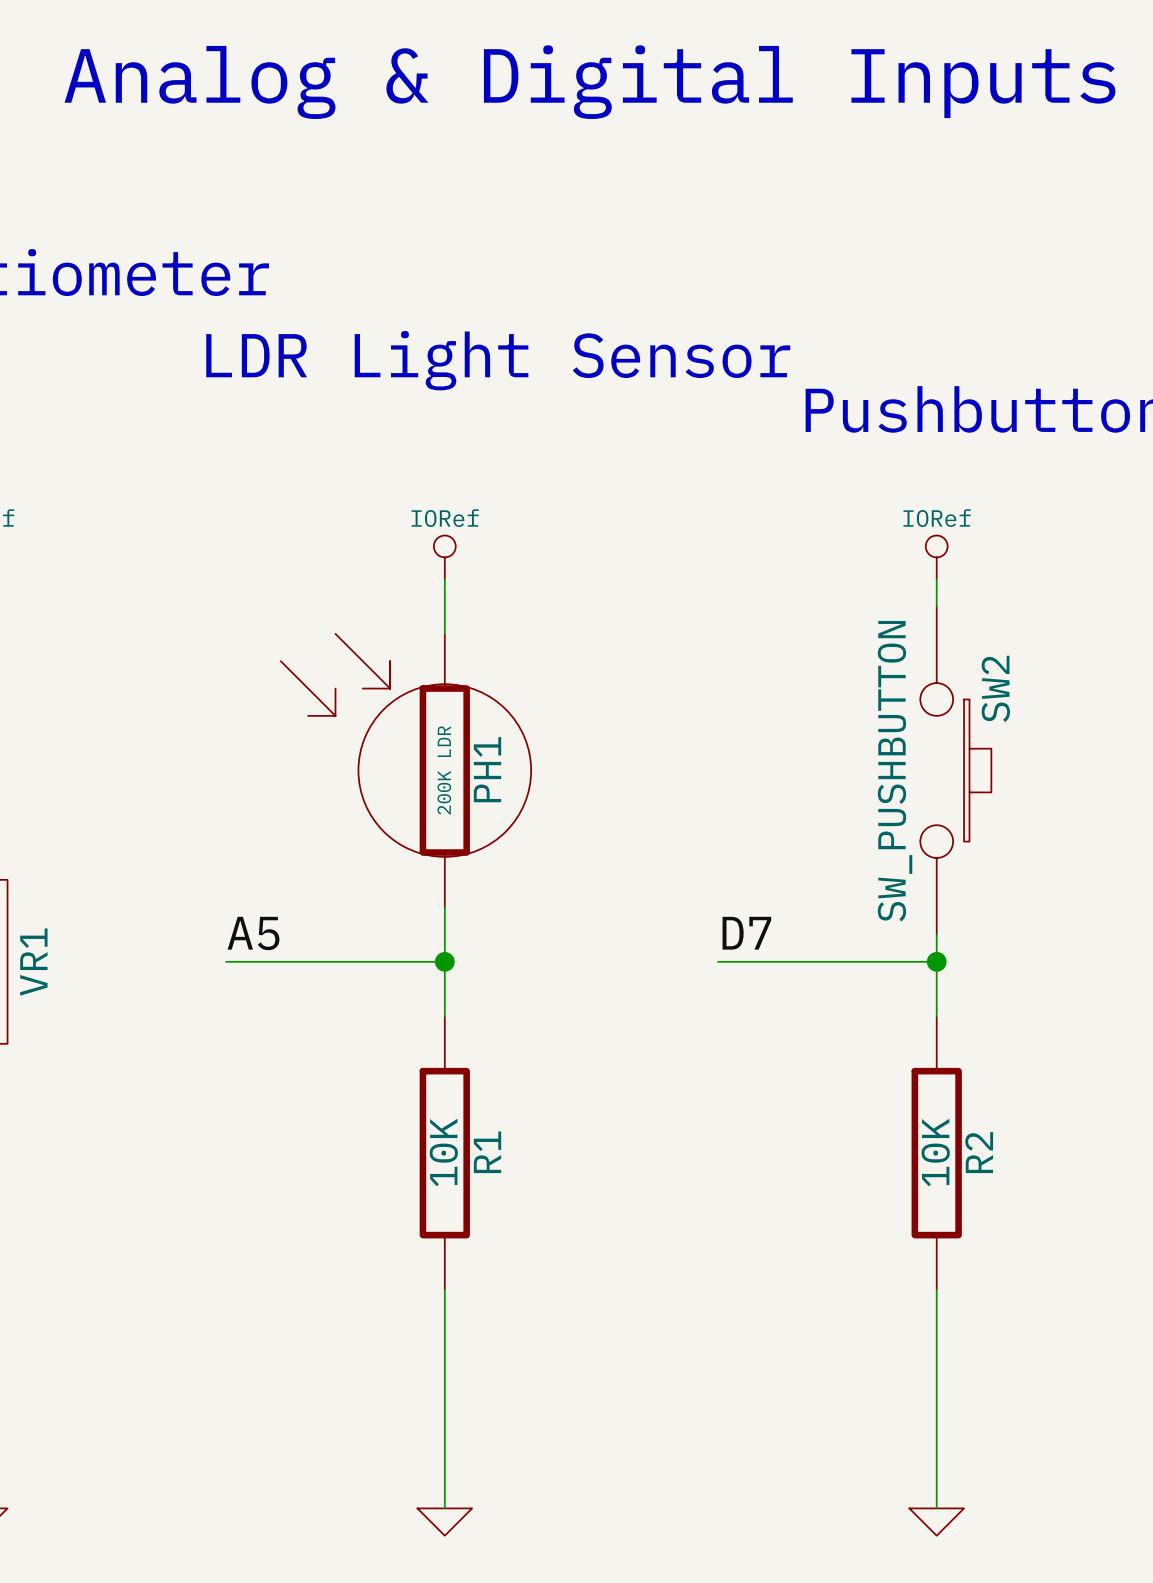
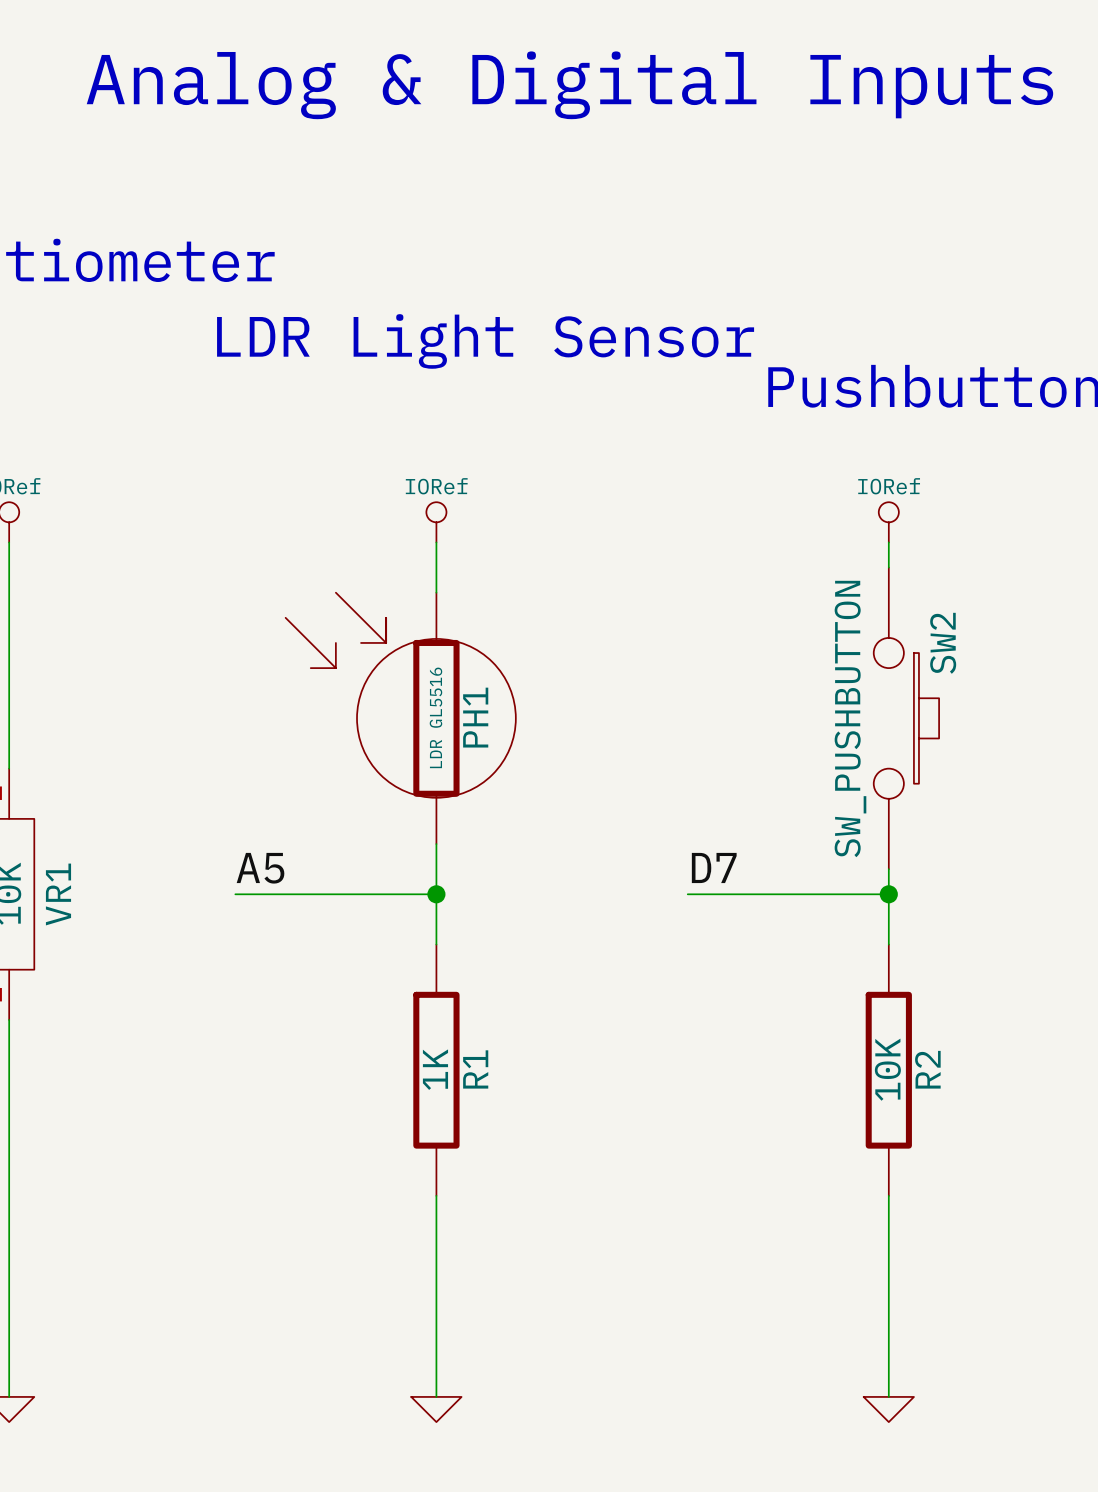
PH1 value: 200K LDR (444, 770) -> LDR GL5516 (435, 717)
R1 value: 10K (443, 1152) -> 1K (435, 1069)

